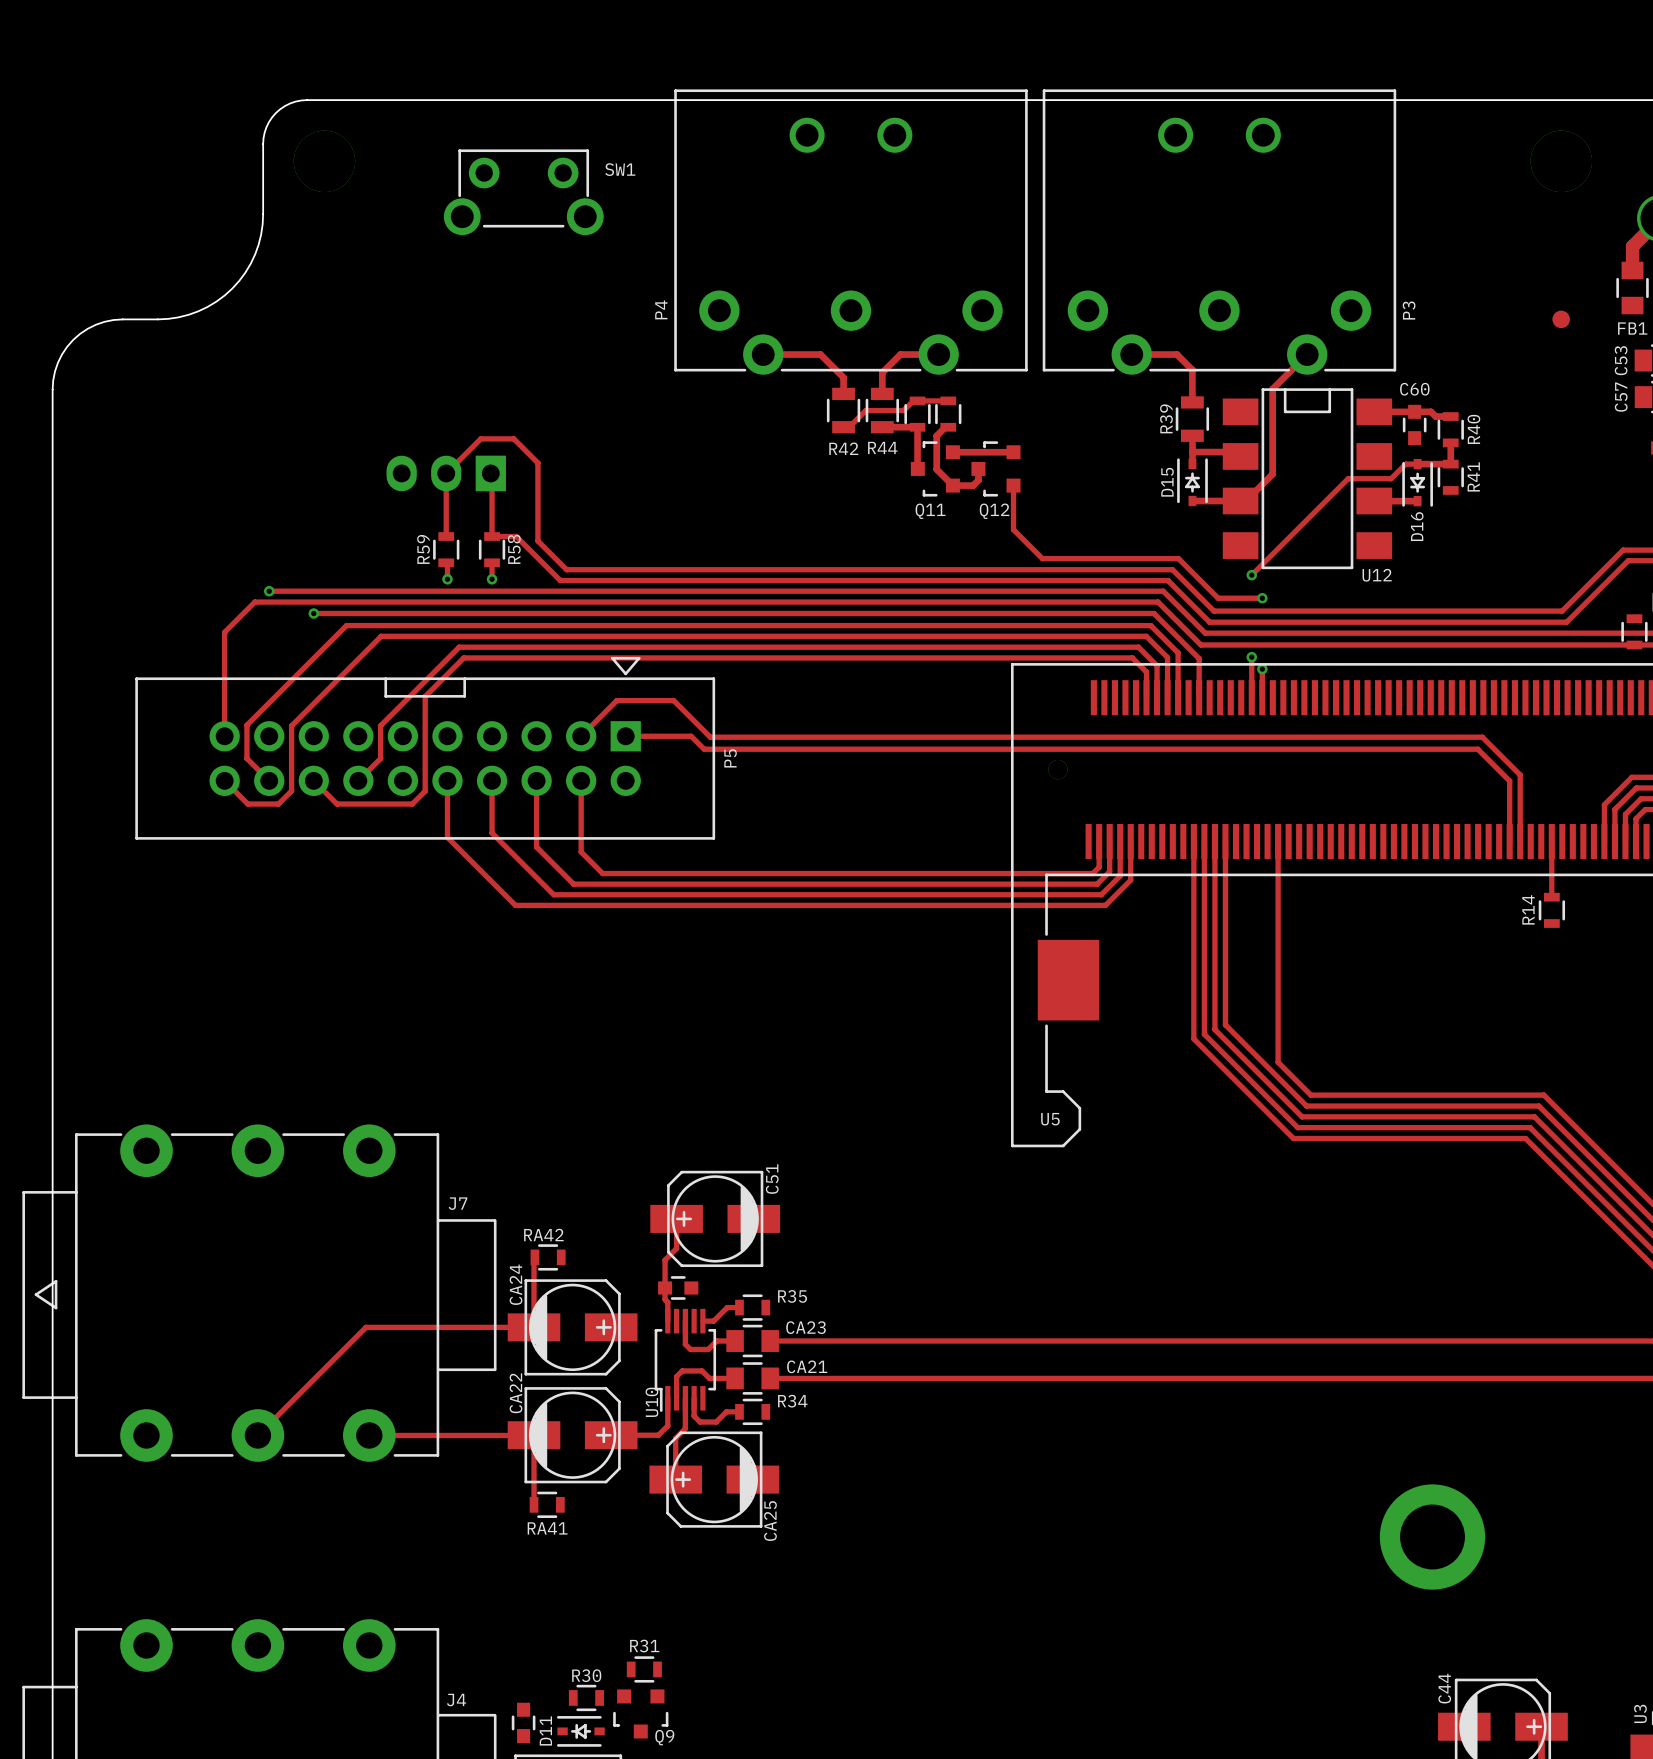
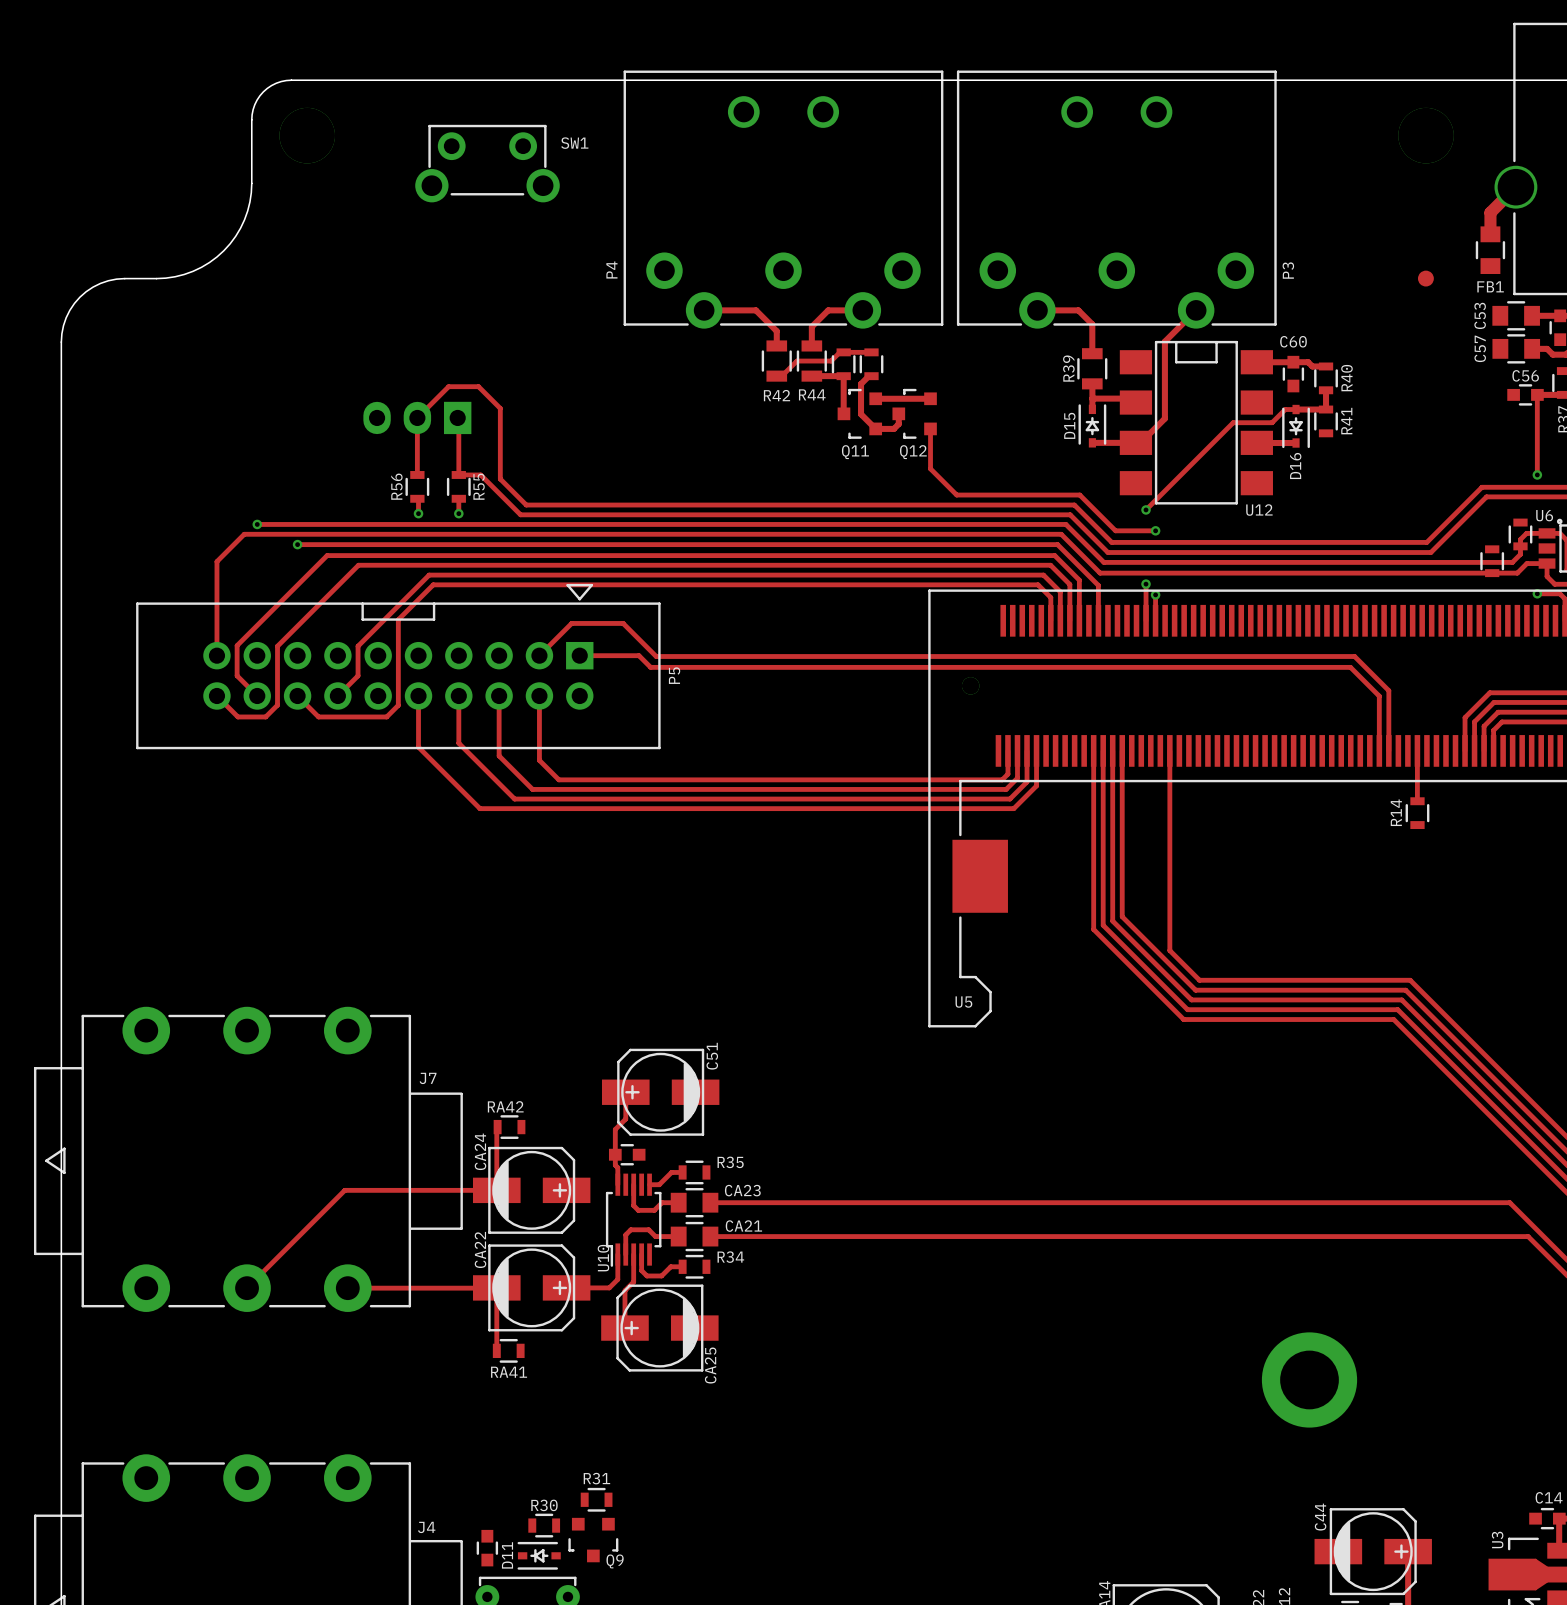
R59 name: R59 (423, 549) -> R56 (396, 486)
R58 name: R58 (514, 549) -> R55 (479, 486)

